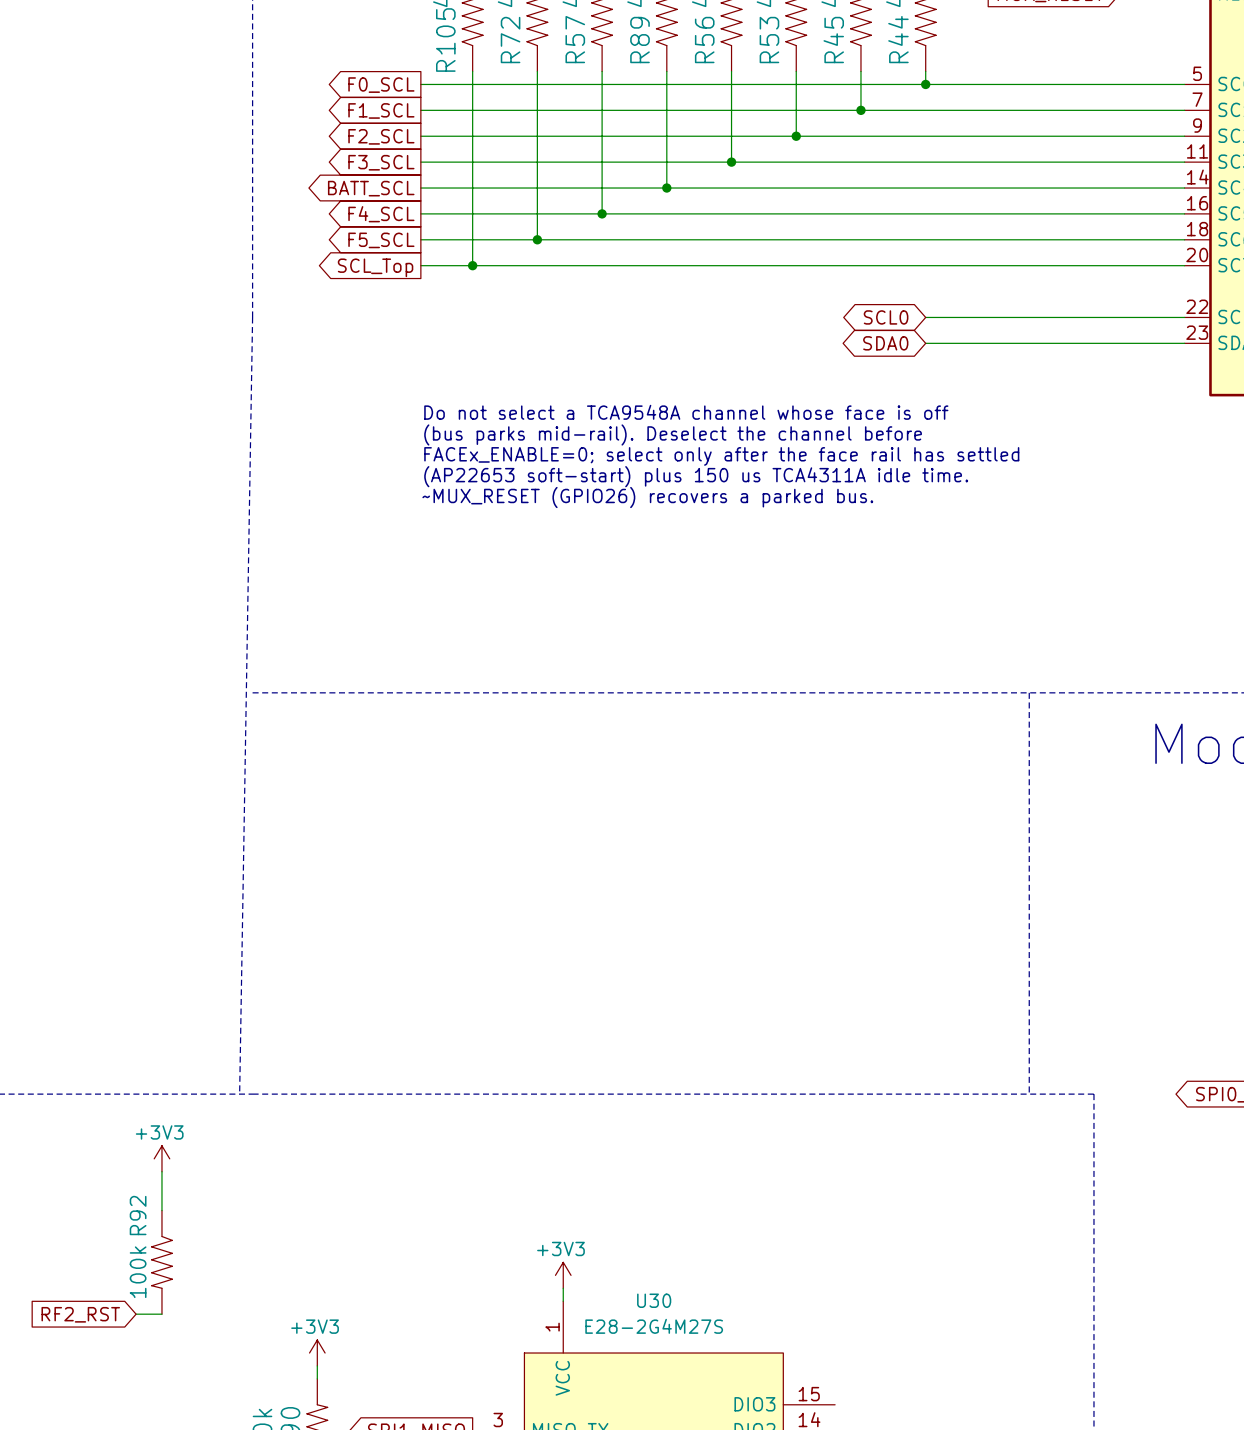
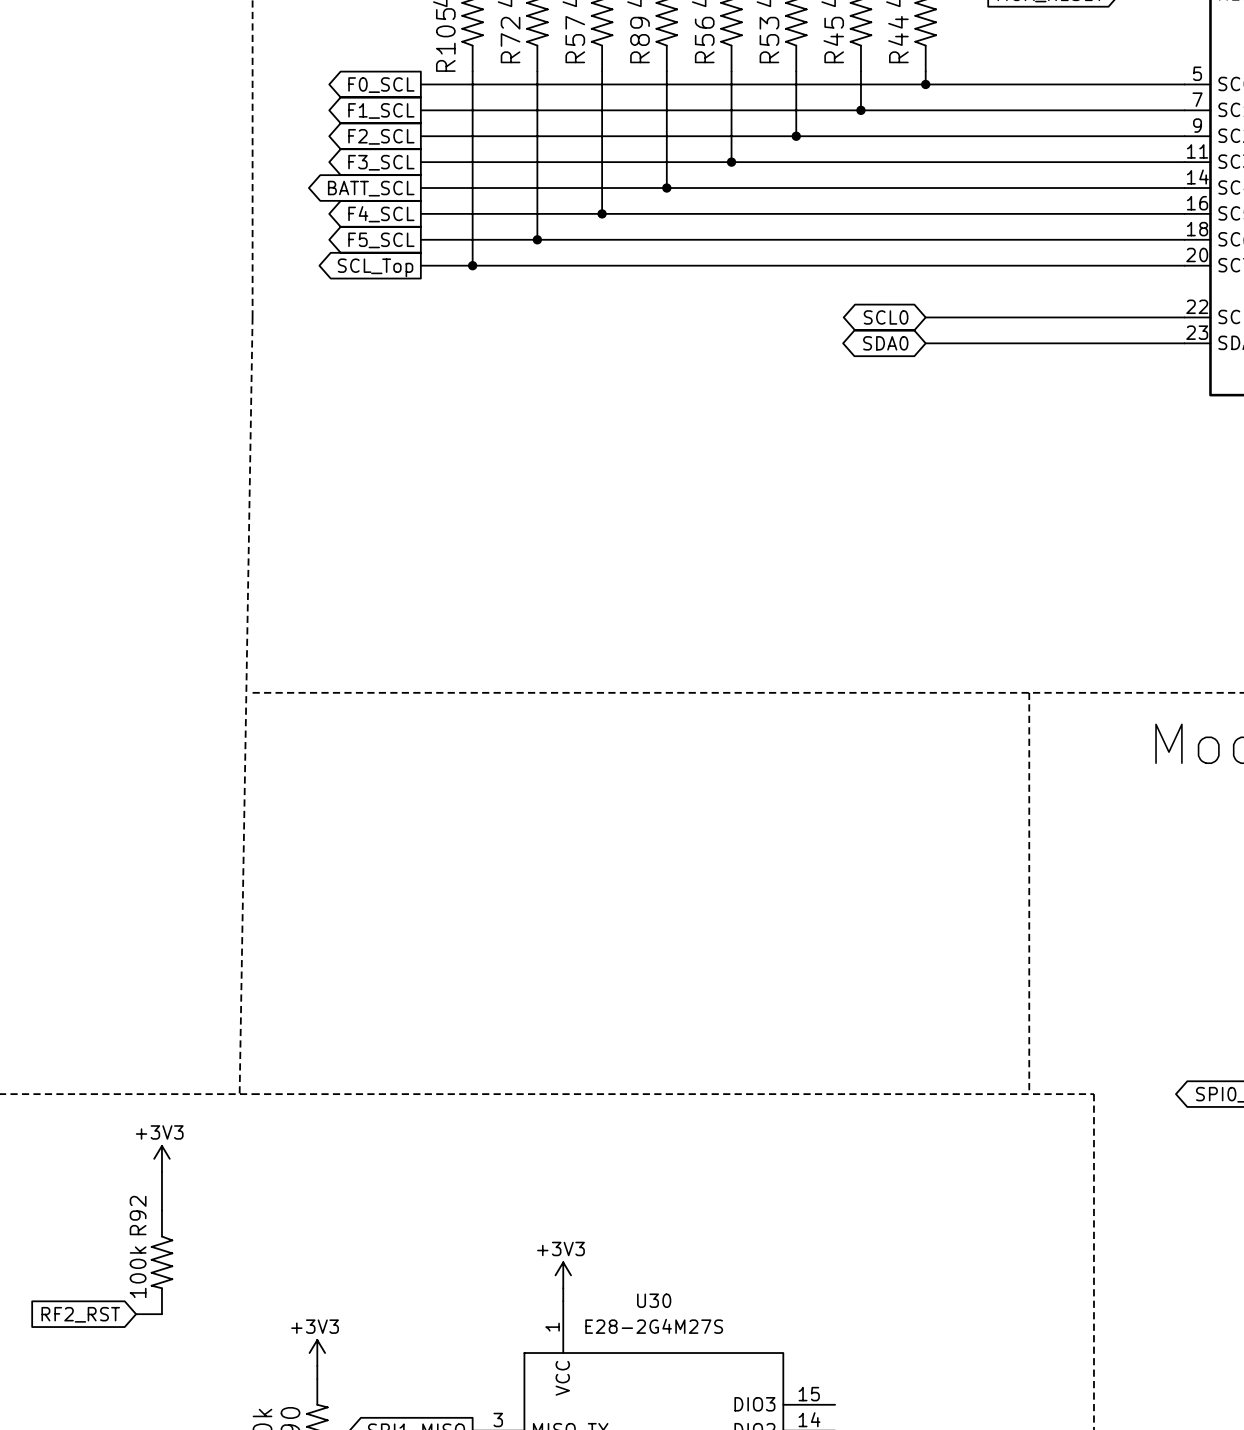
text: Do not select a TCA9548A channel whose face is off (686, 412) -> none
text: (bus parks mid-rail). Deselect the channel before (673, 434) -> none
text: FACEx_ENABLE=0; select only after the face rail has settled (721, 456) -> none
text: (AP22653 soft-start) plus 150 us TCA4311A idle time. (696, 476) -> none
text: ~MUX_RESET (GPIO26) recovers a parked bus. (647, 497) -> none

